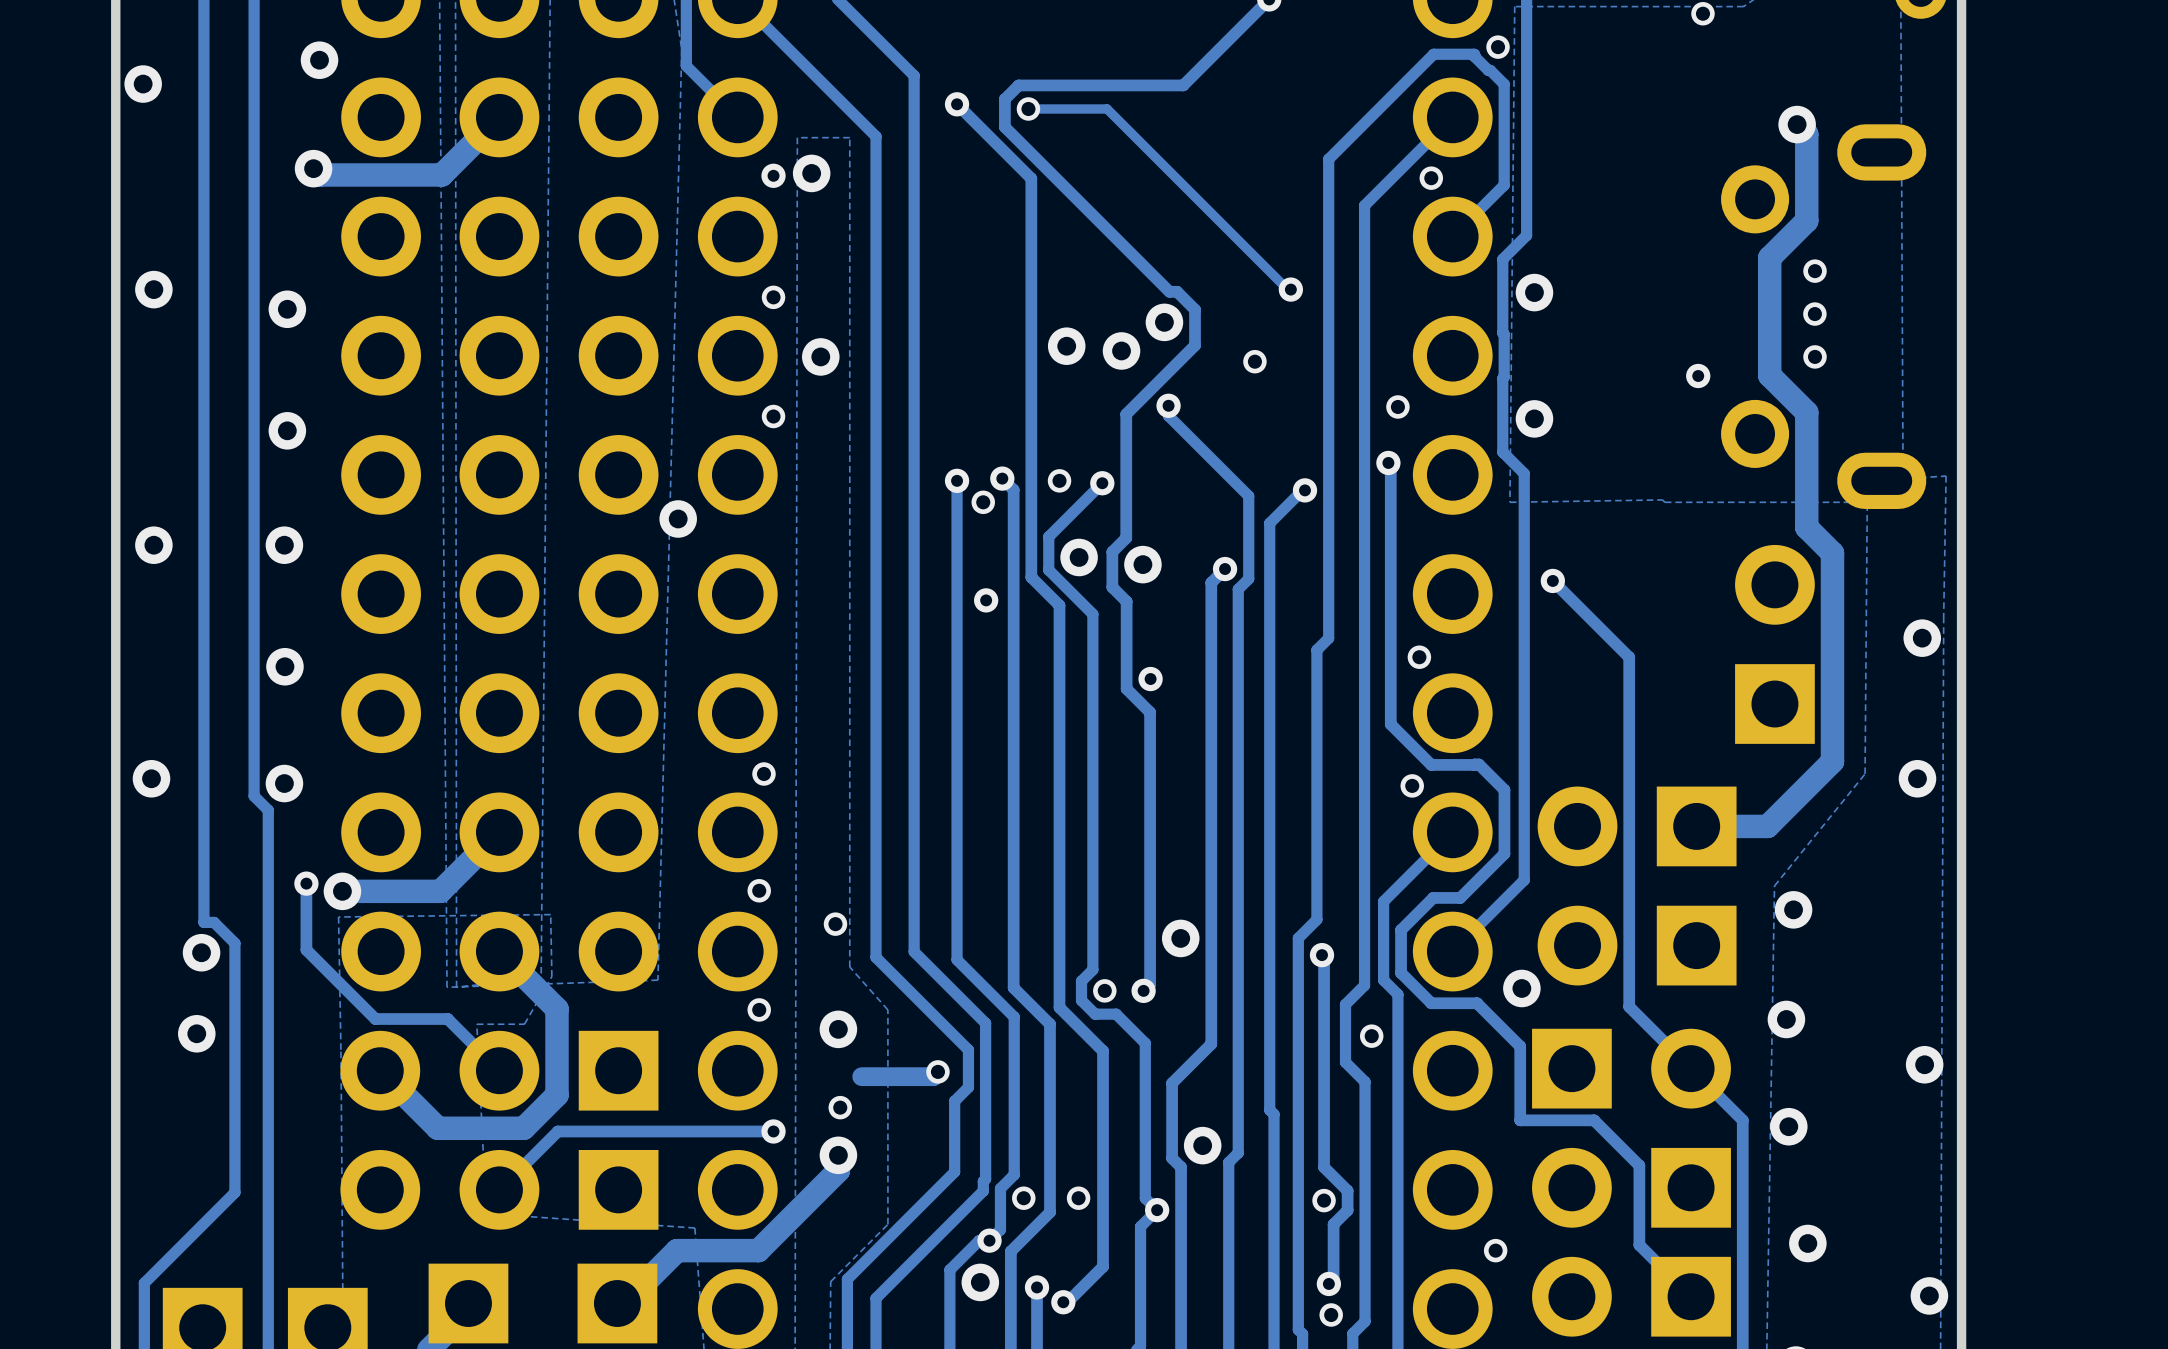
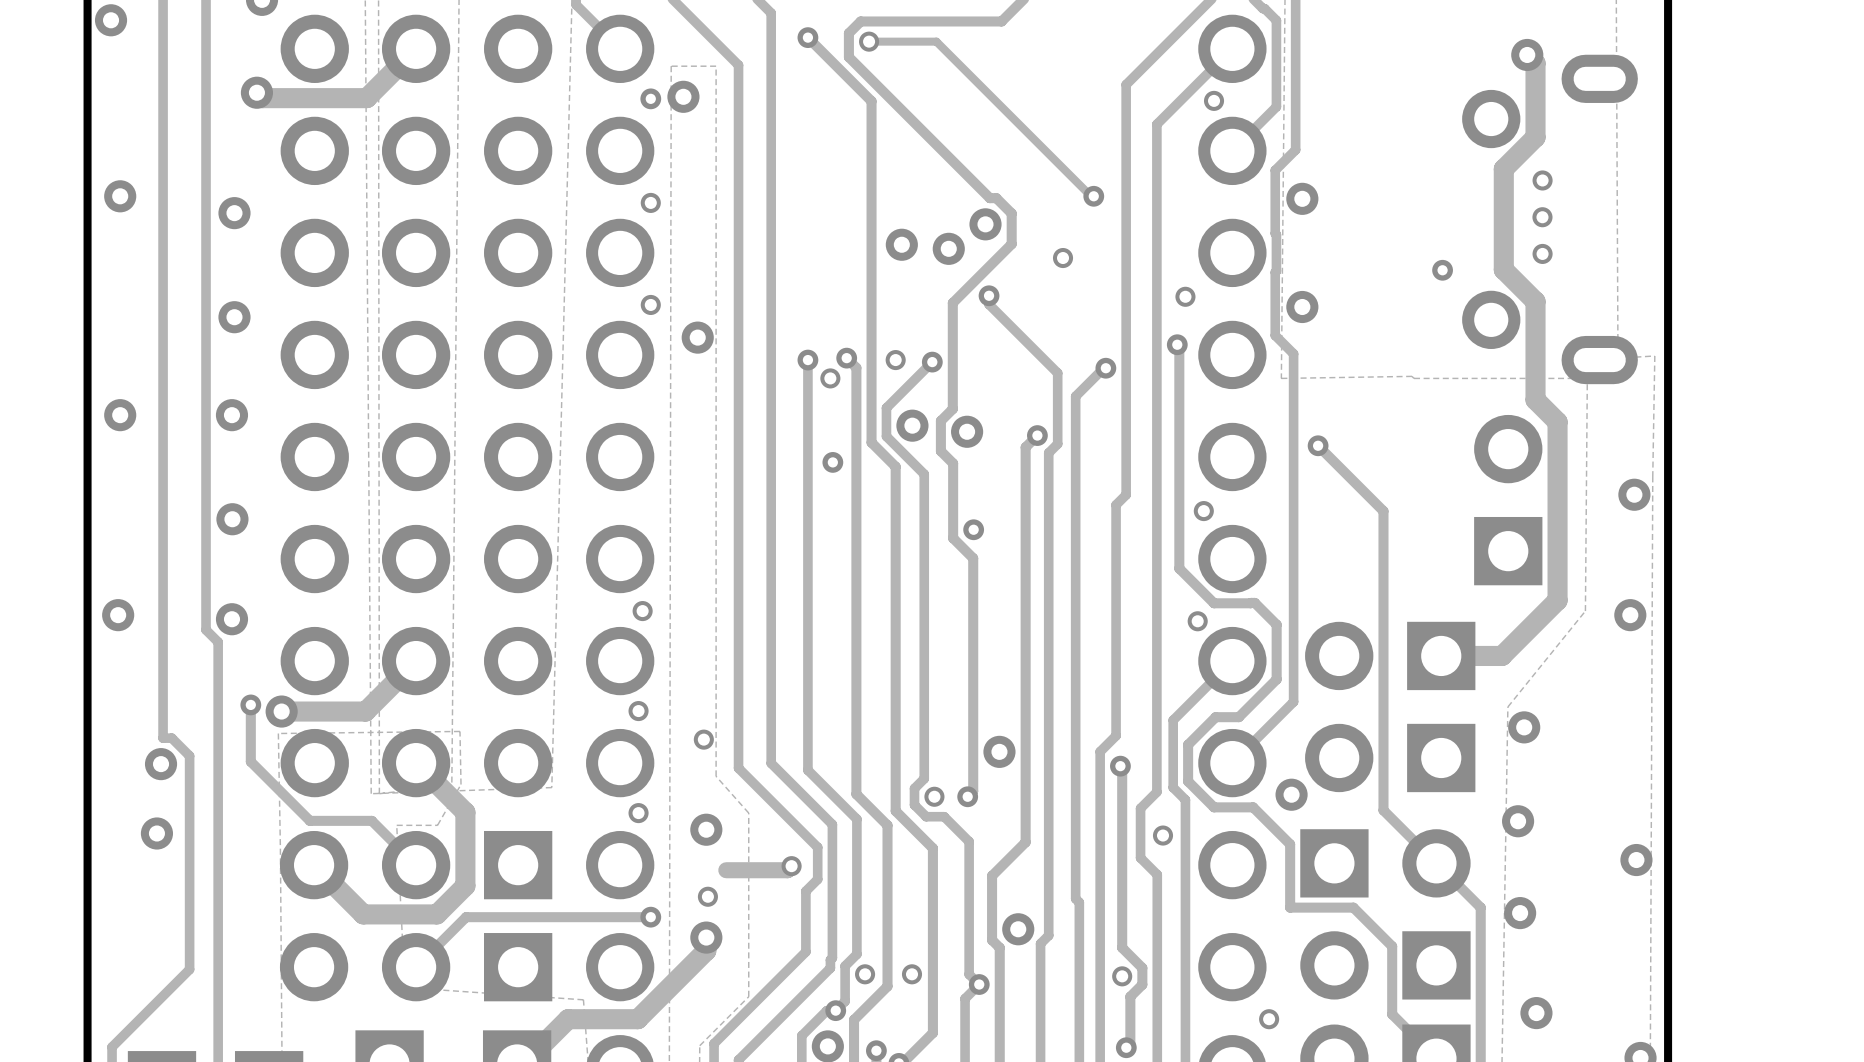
via: (820, 356) -> none
via: none -> (697, 337)
via: (678, 518) -> none

